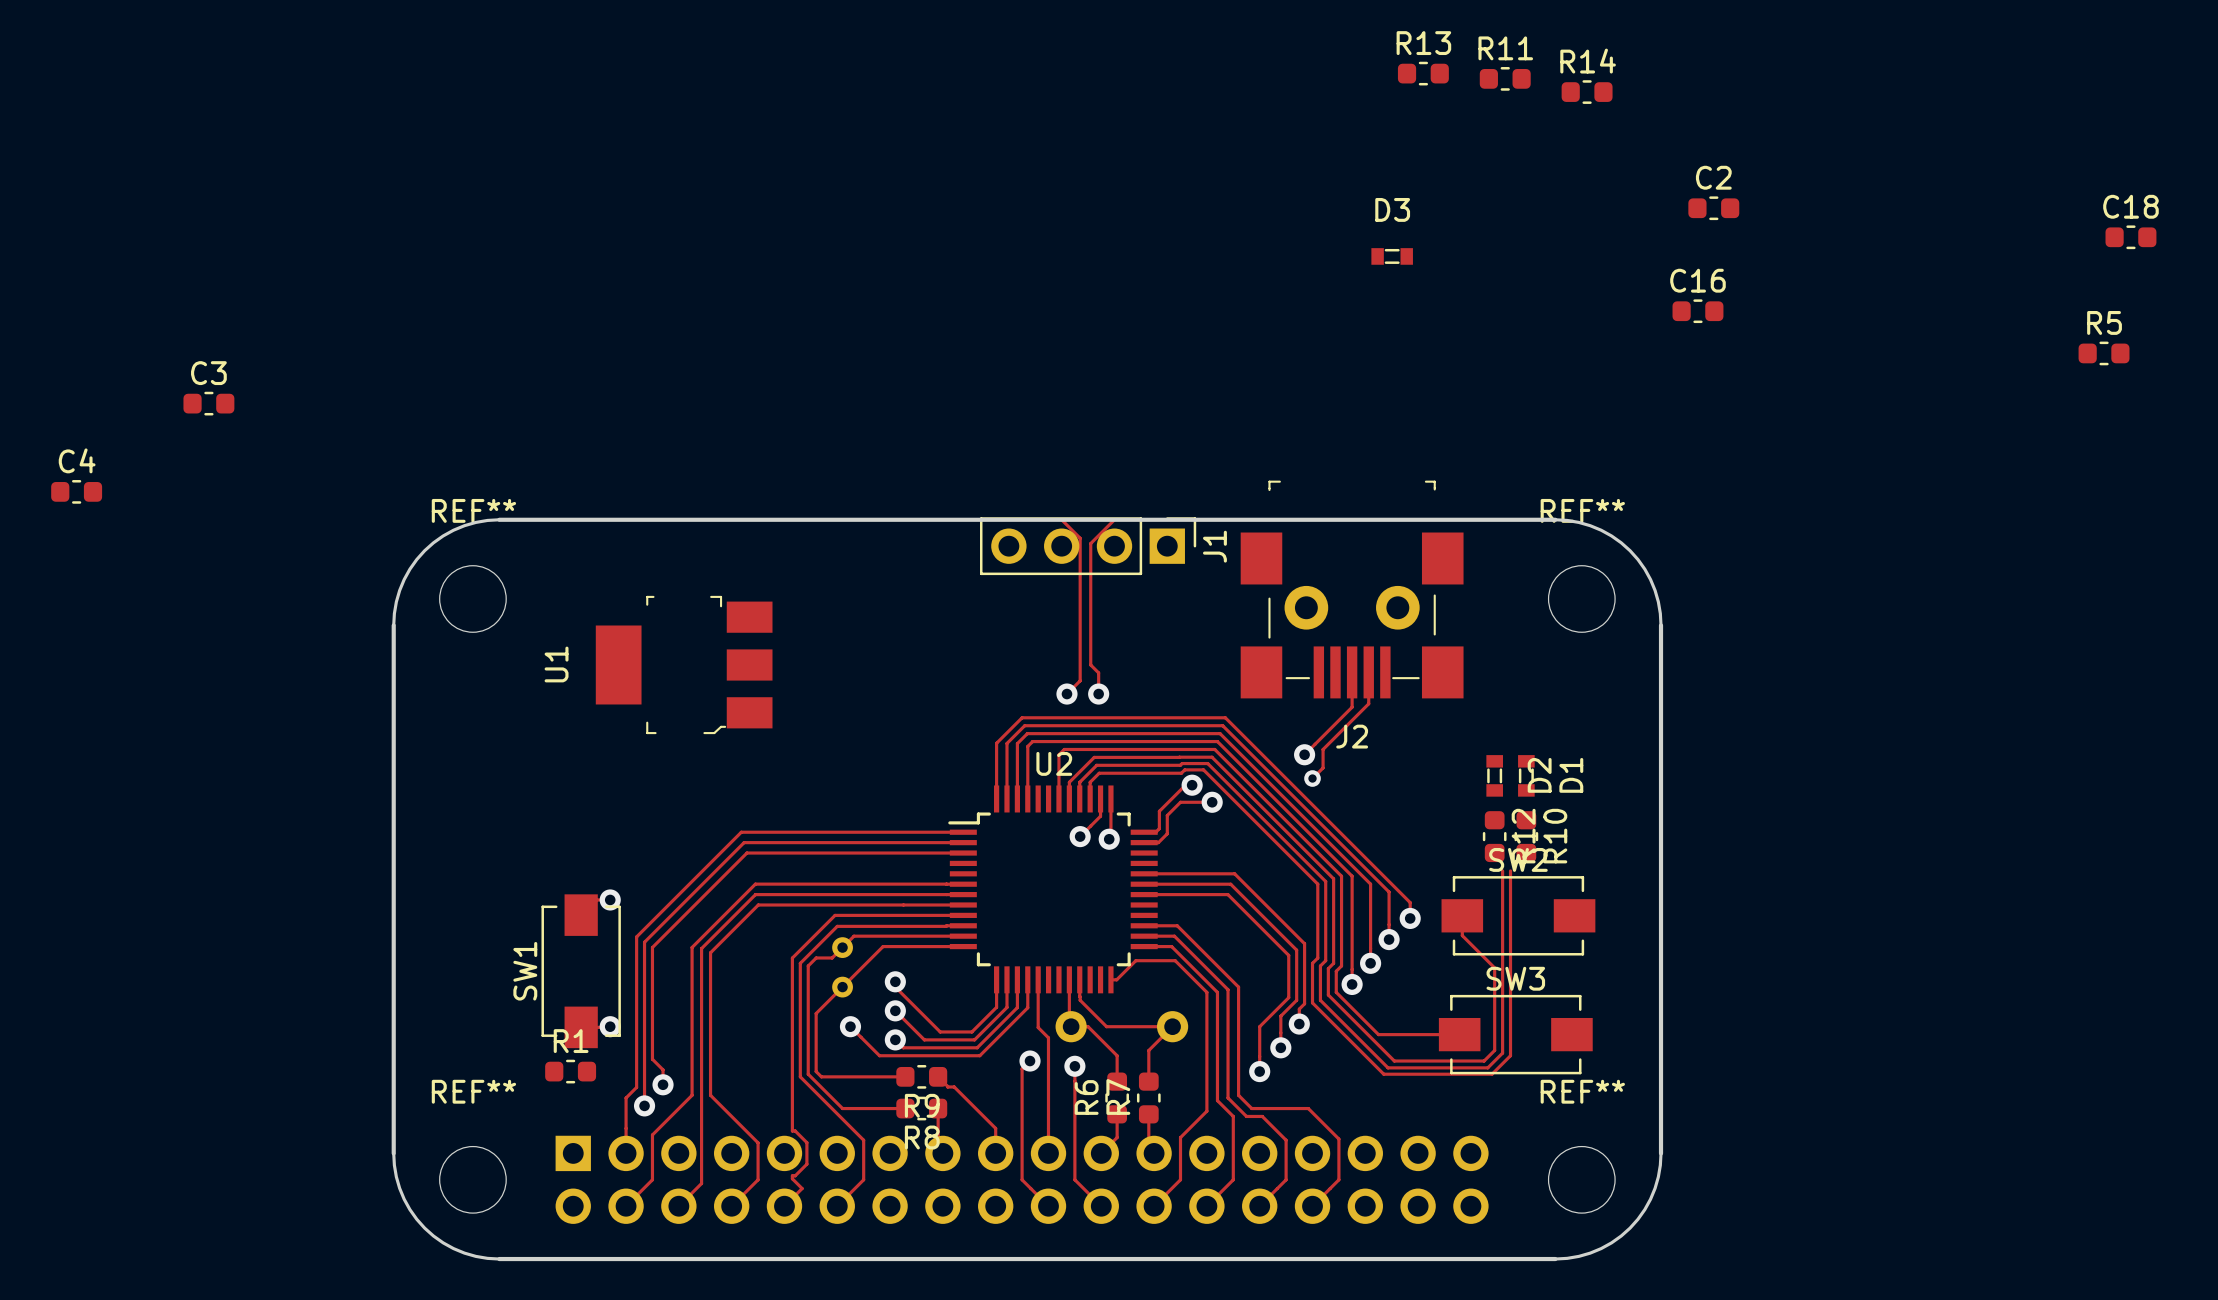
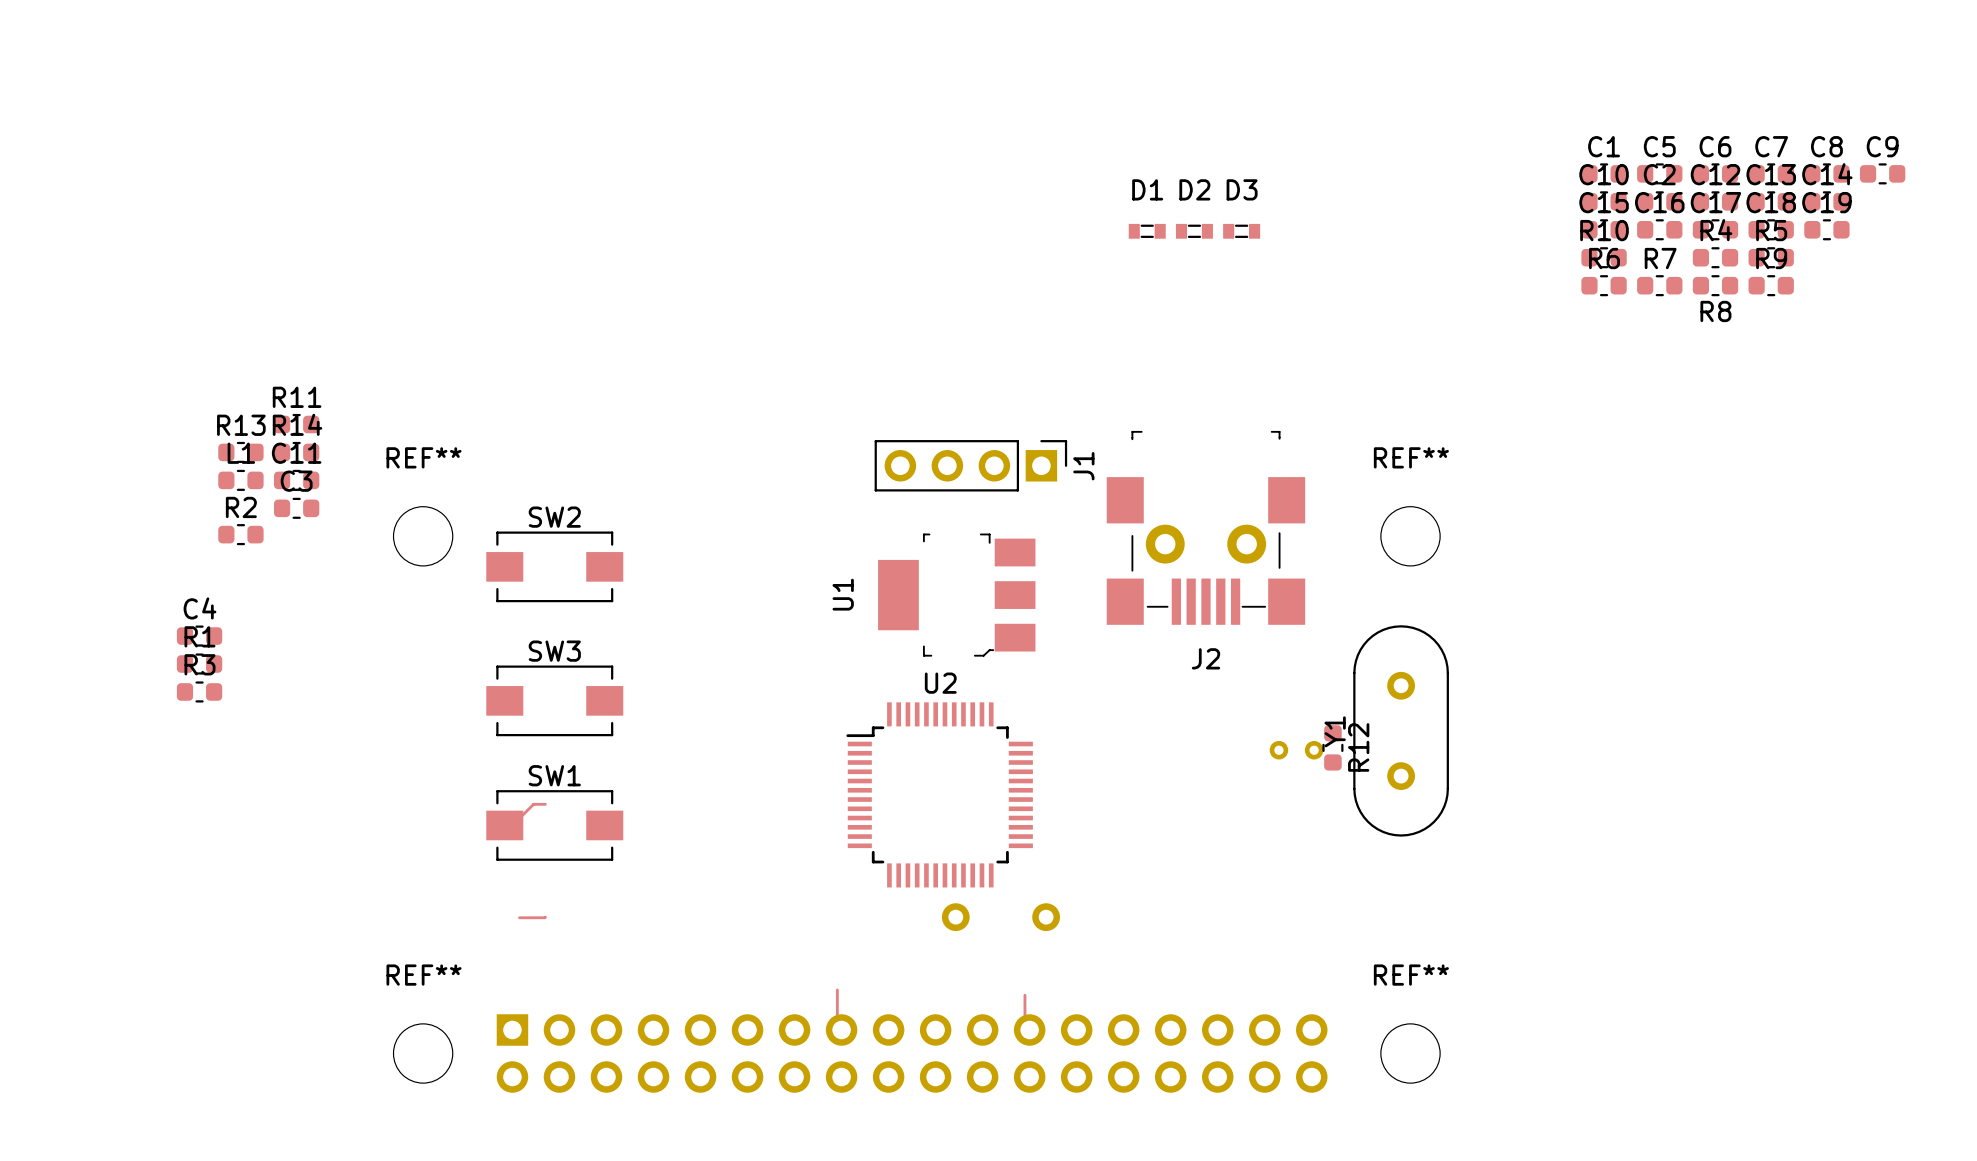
R13 position: (1423, 73) -> (240, 452)
R11 position: (1505, 78) -> (296, 424)
R14 position: (1587, 92) -> (296, 452)
C1: none -> (1604, 173)
C5: none -> (1659, 173)
C6: none -> (1715, 173)
C7: none -> (1771, 173)
C8: none -> (1826, 173)
C9: none -> (1882, 173)
C2 position: (1713, 208) -> (1659, 201)
C10: none -> (1604, 201)
C12: none -> (1715, 201)
C13: none -> (1771, 201)
C14: none -> (1826, 201)
C18 position: (2130, 237) -> (1771, 229)
C15: none -> (1604, 229)
C17: none -> (1715, 229)
C19: none -> (1826, 229)
R4: none -> (1715, 257)
C16 position: (1697, 311) -> (1659, 229)
R5 position: (2104, 353) -> (1771, 257)
C3 position: (208, 403) -> (296, 508)
C4 position: (76, 491) -> (199, 636)
board edge: (499, 519) (1555, 519) (1590, 525) (1611, 535) (1630, 550) (1644, 569) (1658, 601) (1661, 625) (1661, 1153) (1655, 1188) (1644, 1209) (1621, 1235) (1601, 1248) (1578, 1256) (1555, 1259) (499, 1259) (464, 1253) (443, 1242) (424, 1228) (409, 1209) (399, 1188) (394, 1165) (394, 613) (404, 579) (424, 550) (443, 535) (464, 525) (499, 519) -> none
track: (1061, 519) (1080, 538) (1080, 680) (1066, 694) -> none
track: (1114, 519) (1090, 543) (1090, 664) (1098, 672) (1098, 694) -> none
L1: none -> (240, 480)
C11: none -> (296, 480)
J1 position: (1088, 546) -> (970, 465)
R2: none -> (240, 534)
U1 position: (684, 664) -> (956, 595)
track: (1352, 672) (1352, 707) (1304, 754) -> none
track: (1368, 672) (1368, 703) (1323, 749) (1323, 767) (1312, 778) -> none
via: (1066, 694) -> none
via: (1098, 694) -> none
via: (1304, 754) -> none
track: (1179, 757) (1212, 757) (1333, 878) (1333, 963) (1328, 968) (1328, 995) (1394, 1061) (1484, 1061) (1494, 1050) (1494, 967) (1462, 935) (1462, 915) -> none
track: (1179, 757) (1094, 757) (1069, 782) (1069, 798) -> none
R3: none -> (199, 691)
D2 rotation: 0° (1494, 775) -> 90° clockwise (1194, 231)
D2 position: (1494, 775) -> (1194, 231)
D1 rotation: 0° (1526, 775) -> 90° clockwise (1147, 231)
D1 position: (1526, 775) -> (1147, 231)
D2 name position: D2 (1539, 775) -> D2 (1194, 189)
D1 name position: D1 (1571, 775) -> D1 (1147, 189)
via: (1312, 778) -> none
track: (1192, 785) (1185, 785) (1159, 811) (1159, 828) (1155, 832) (1144, 832) -> none
via: (1192, 785) -> none
track: (996, 798) (996, 743) (1022, 717) (1225, 717) (1410, 902) (1410, 918) -> none
track: (1007, 798) (1007, 743) (1024, 725) (1222, 725) (1389, 892) (1389, 939) -> none
track: (1017, 798) (1017, 743) (1027, 733) (1220, 733) (1370, 884) (1370, 963) -> none
track: (1027, 798) (1027, 746) (1032, 741) (1217, 741) (1352, 876) (1352, 984) -> none
track: (1058, 798) (1058, 754) (1064, 749) (1214, 749) (1341, 876) (1341, 965) (1336, 971) (1336, 992) (1378, 1034) (1459, 1034) -> none
track: (1079, 798) (1079, 782) (1096, 765) (1207, 763) (1325, 881) (1325, 960) (1320, 965) (1320, 1000) (1388, 1067) (1487, 1067) (1502, 1053) (1502, 870) -> none
track: (1090, 798) (1090, 782) (1099, 773) (1181, 773) (1184, 769) (1203, 769) (1317, 884) (1317, 958) (1312, 963) (1312, 1002) (1383, 1074) (1492, 1074) (1510, 1055) (1510, 870) -> none
track: (1100, 798) (1100, 816) (1080, 836) -> none
track: (1110, 798) (1110, 837) (1109, 839) -> none
track: (1212, 802) (1180, 802) (1167, 815) (1167, 833) (1158, 842) (1144, 842) -> none
via: (1212, 802) -> none
Y1: none -> (1401, 730)
track: (963, 832) (741, 832) (636, 936) (636, 1087) (626, 1097) (626, 1153) -> none
via: (1080, 836) -> none
R10 rotation: 0° (1526, 836) -> 90° clockwise (1604, 257)
R10 position: (1526, 836) -> (1604, 257)
R10 name position: R10 (1555, 836) -> R10 (1604, 230)
via: (1109, 839) -> none
part: none -> (1296, 750)
track: (963, 842) (744, 842) (644, 942) (644, 1105) -> none
track: (963, 853) (746, 853) (652, 947) (652, 1059) (663, 1069) (663, 1084) -> none
track: (1144, 873) (1234, 873) (1304, 943) (1304, 1003) (1299, 1009) (1299, 1024) -> none
track: (963, 884) (755, 884) (692, 947) (692, 1095) (652, 1134) (652, 1179) (626, 1206) -> none
track: (1144, 884) (1230, 884) (1296, 950) (1296, 1000) (1280, 1016) (1280, 1047) -> none
track: (963, 894) (755, 894) (701, 948) (701, 1183) (678, 1206) -> none
track: (1144, 894) (1227, 894) (1288, 955) (1288, 997) (1259, 1026) (1259, 1071) -> none
via: (610, 899) -> none
track: (963, 905) (758, 905) (710, 952) (710, 1095) (758, 1142) (758, 1179) (731, 1206) -> none
track: (963, 915) (835, 915) (792, 958) (792, 1131) (795, 1131) (806, 1142) (806, 1164) (795, 1175) (792, 1175) (792, 1178) (802, 1188) (784, 1206) -> none
SW2 position: (1518, 915) -> (554, 566)
via: (1410, 918) -> none
track: (963, 925) (837, 926) (800, 963) (800, 1076) (863, 1140) (863, 1179) (837, 1206) -> none
track: (1144, 925) (1177, 925) (1238, 987) (1238, 1095) (1251, 1108) (1308, 1108) (1338, 1139) (1338, 1179) (1312, 1206) -> none
track: (963, 936) (853, 936) (832, 957) (816, 957) (808, 965) (808, 1074) (842, 1108) (905, 1108) -> none
track: (1144, 936) (1174, 936) (1228, 989) (1228, 1097) (1246, 1116) (1262, 1116) (1286, 1140) (1286, 1179) (1259, 1206) -> none
via: (1389, 939) -> none
track: (963, 946) (883, 946) (816, 1013) (816, 1071) (821, 1076) (905, 1076) -> none
track: (1144, 946) (1171, 946) (1217, 992) (1217, 1100) (1233, 1116) (1233, 1179) (1206, 1206) -> none
via: (1370, 963) -> none
part: (842, 967) -> none
SW1 rotation: 0° (581, 971) -> 90° clockwise (554, 825)
track: (996, 979) (996, 1007) (971, 1031) (940, 1031) (895, 987) (895, 981) -> none
track: (1007, 979) (1007, 1007) (974, 1039) (924, 1039) (895, 1010) -> none
track: (1017, 979) (1017, 1007) (977, 1047) (903, 1047) (895, 1039) -> none
track: (1027, 979) (1027, 1007) (979, 1055) (879, 1055) (850, 1026) -> none
track: (1038, 979) (1038, 1027) (1048, 1037) (1048, 1153) -> none
track: (1069, 979) (1069, 1024) (1071, 1026) (1088, 1026) (1117, 1055) (1117, 1081) -> none
track: (1079, 979) (1080, 1000) (1106, 1026) (1172, 1026) (1148, 1050) (1148, 1081) -> none
track: (1110, 979) (1116, 979) (1135, 960) (1175, 960) (1206, 992) (1206, 1111) (1180, 1137) (1180, 1179) (1154, 1206) -> none
via: (895, 981) -> none
via: (1352, 984) -> none
via: (895, 1010) -> none
via: (1299, 1024) -> none
via: (610, 1026) -> none
via: (850, 1026) -> none
SW3 position: (1515, 1034) -> (554, 700)
via: (895, 1039) -> none
via: (1280, 1047) -> none
track: (1030, 1061) (1022, 1068) (1022, 1179) (1048, 1206) -> none
via: (1030, 1061) -> none
track: (1074, 1066) (1074, 1179) (1101, 1206) -> none
via: (1074, 1066) -> none
R1 position: (570, 1071) -> (199, 664)
via: (1259, 1071) -> none
R9 position: (921, 1076) -> (1771, 285)
track: (938, 1076) (947, 1086) (954, 1086) (995, 1128) (995, 1153) -> none
via: (663, 1084) -> none
R6 rotation: 0° (1117, 1097) -> 90° clockwise (1604, 285)
R6 position: (1117, 1097) -> (1604, 285)
R7 rotation: 0° (1148, 1097) -> 90° clockwise (1659, 285)
R7 position: (1148, 1097) -> (1659, 285)
via: (644, 1105) -> none
R9 name position: R9 (922, 1105) -> R9 (1771, 258)
R8 position: (921, 1108) -> (1715, 285)
track: (1117, 1114) (1117, 1137) (1101, 1153) -> none

